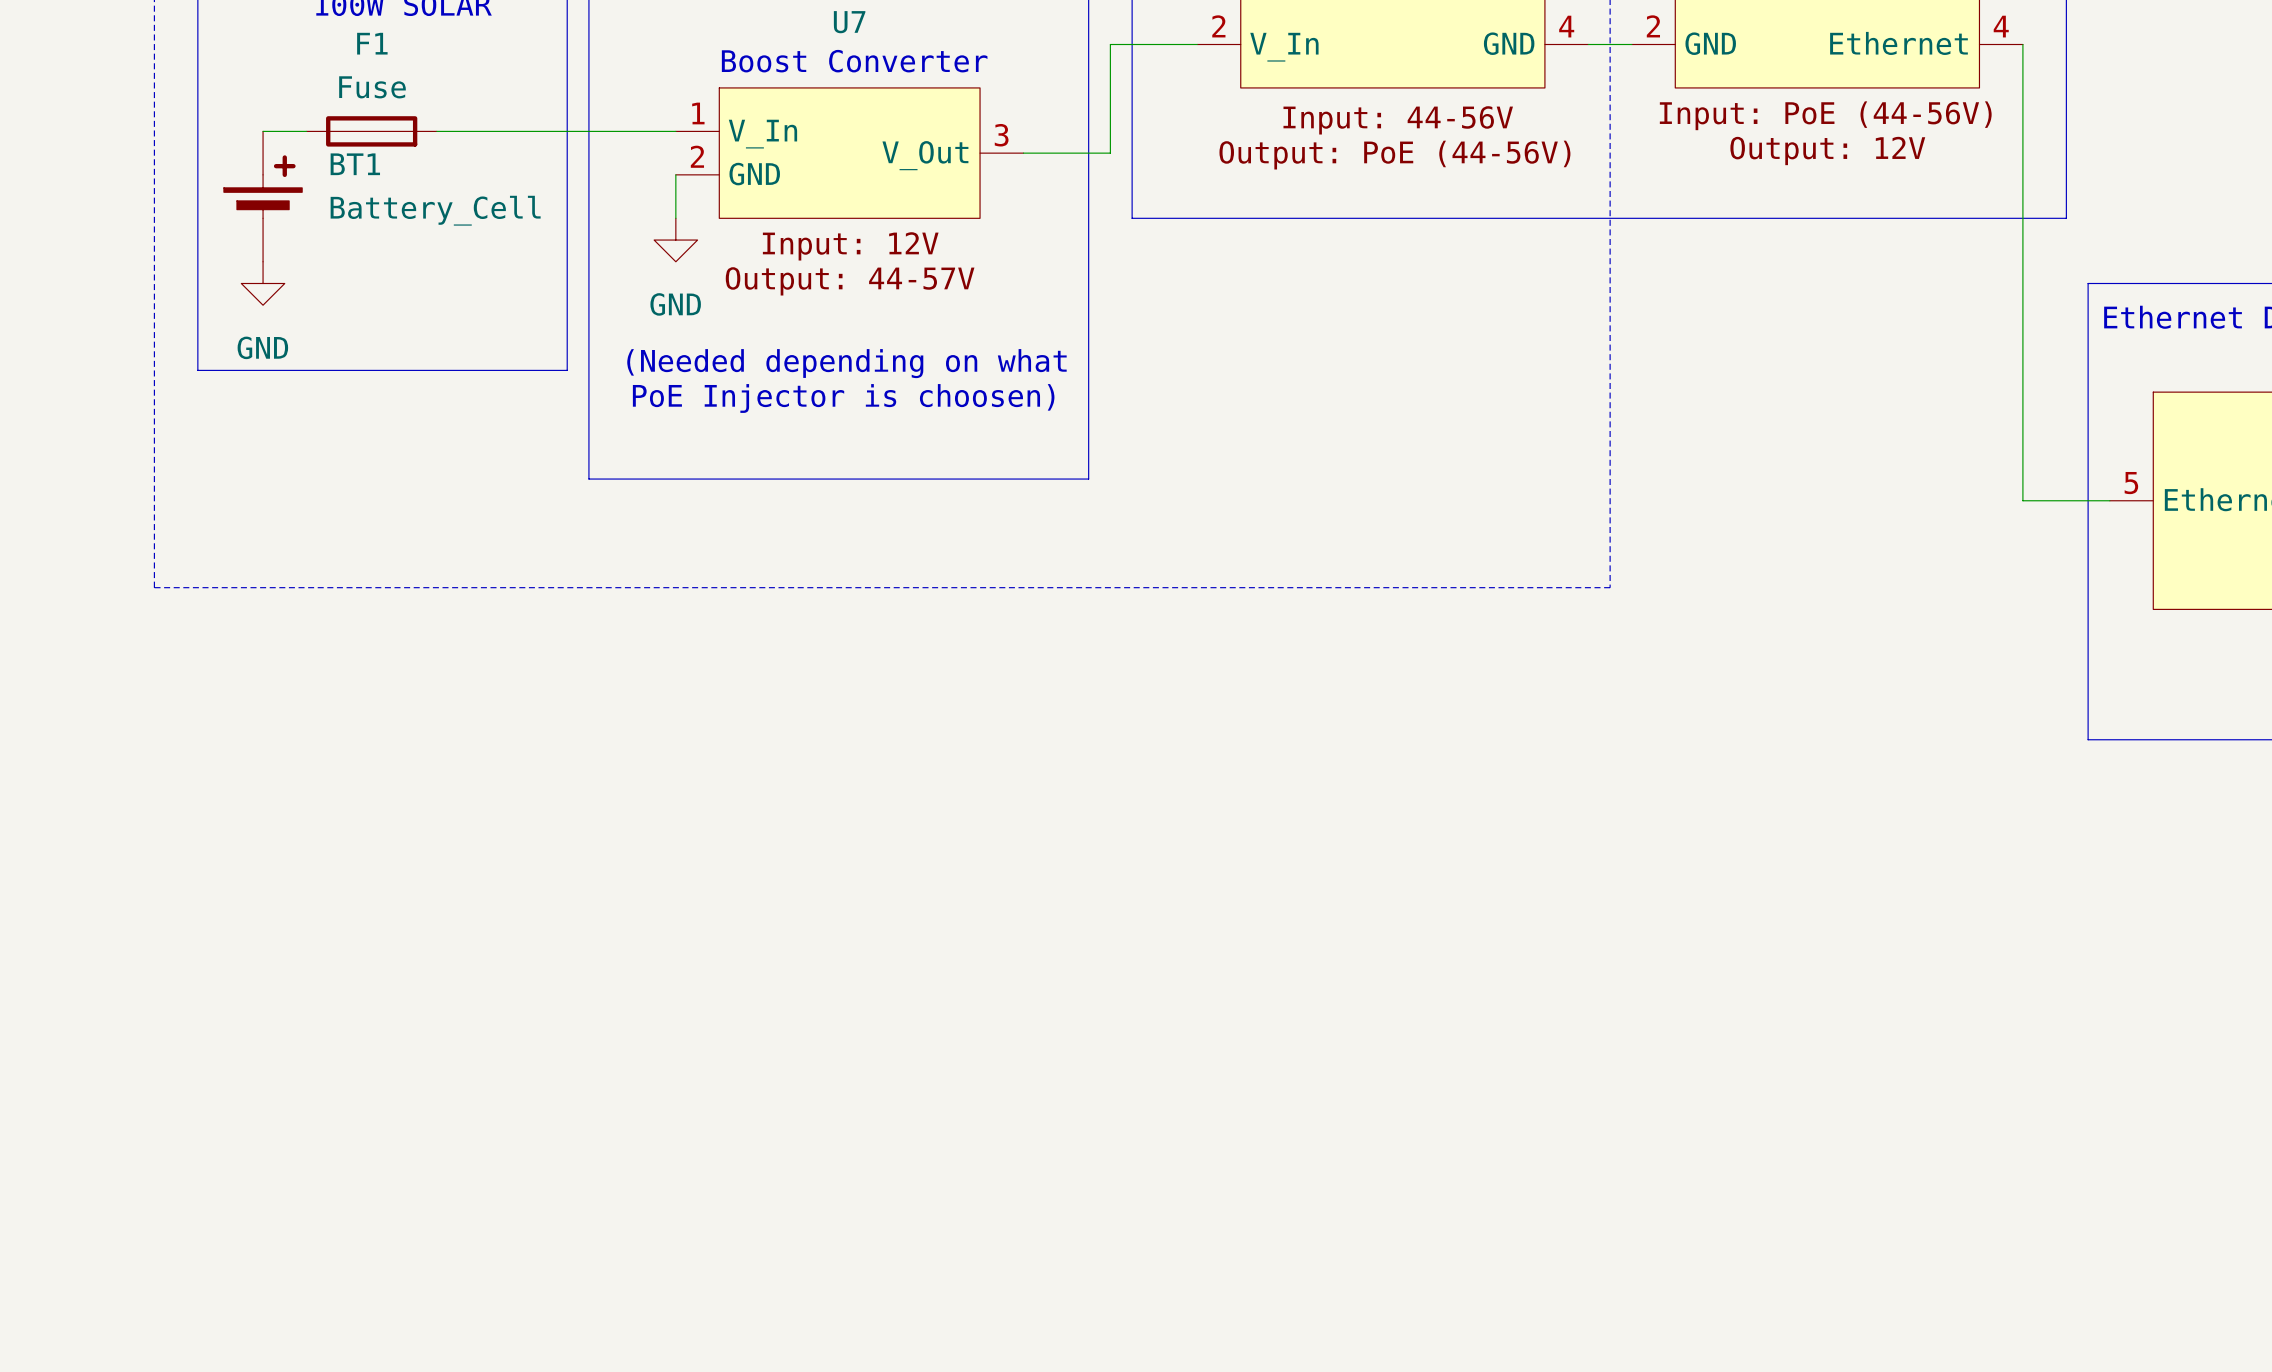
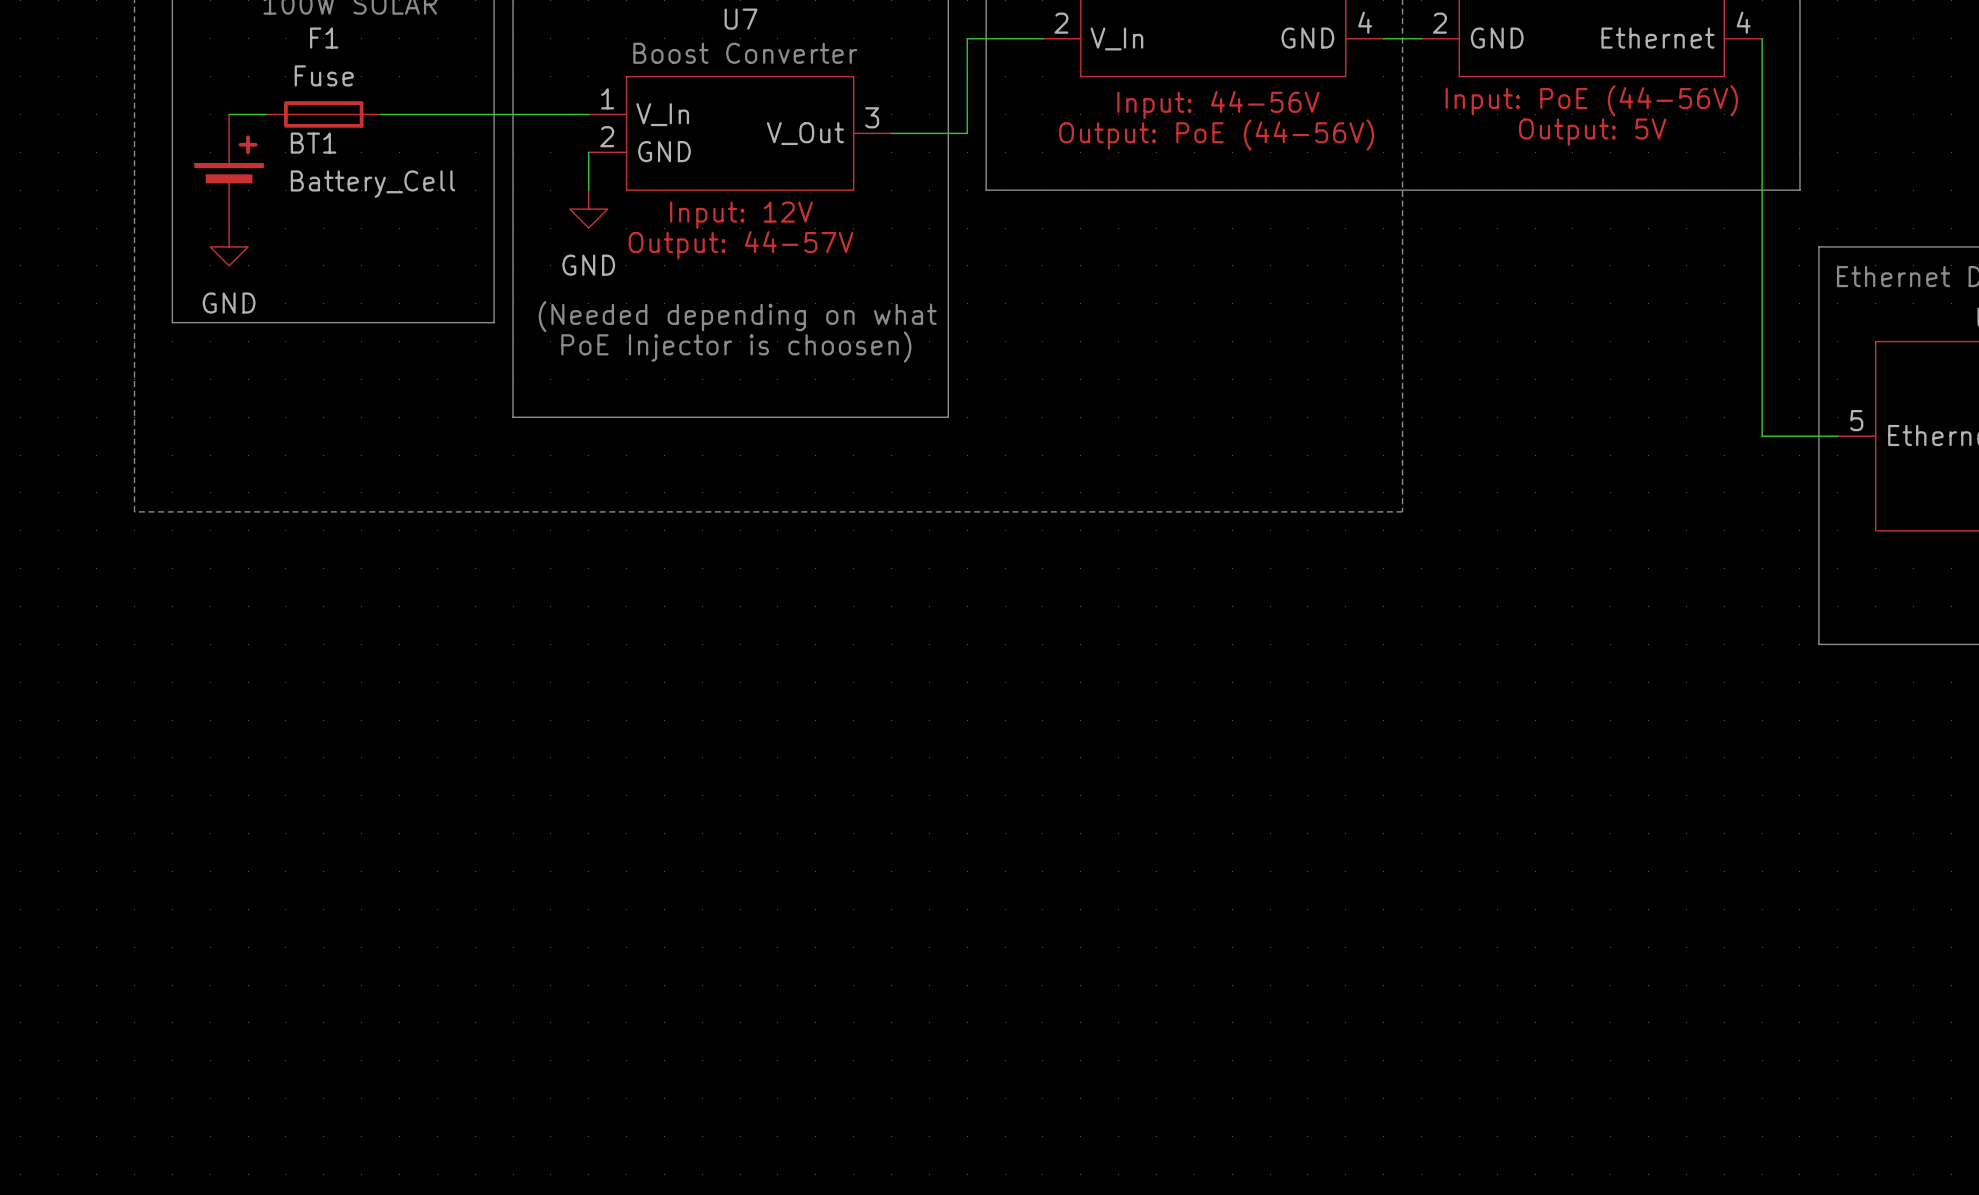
part text: Output: 12V (1827, 150) -> Output: 5V (1592, 132)

